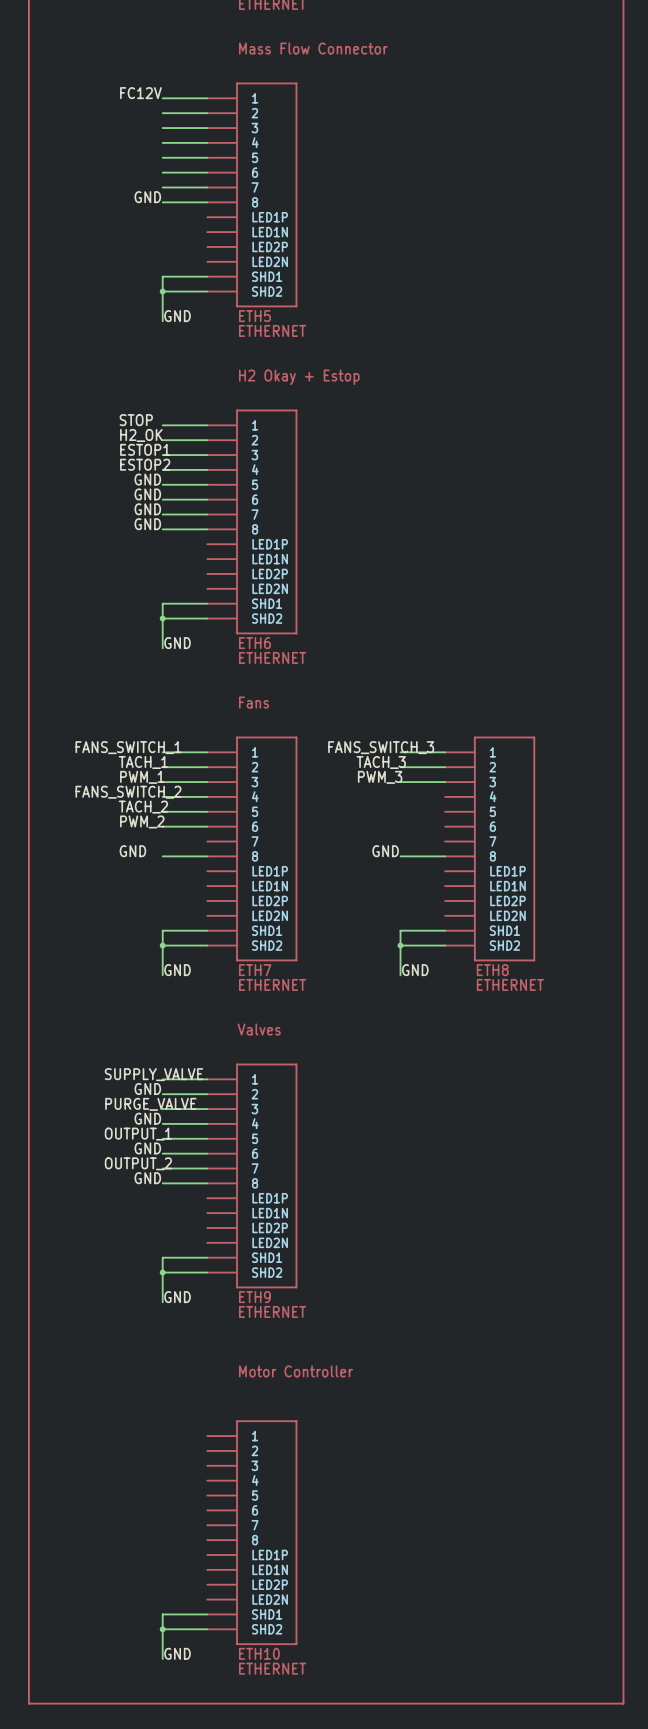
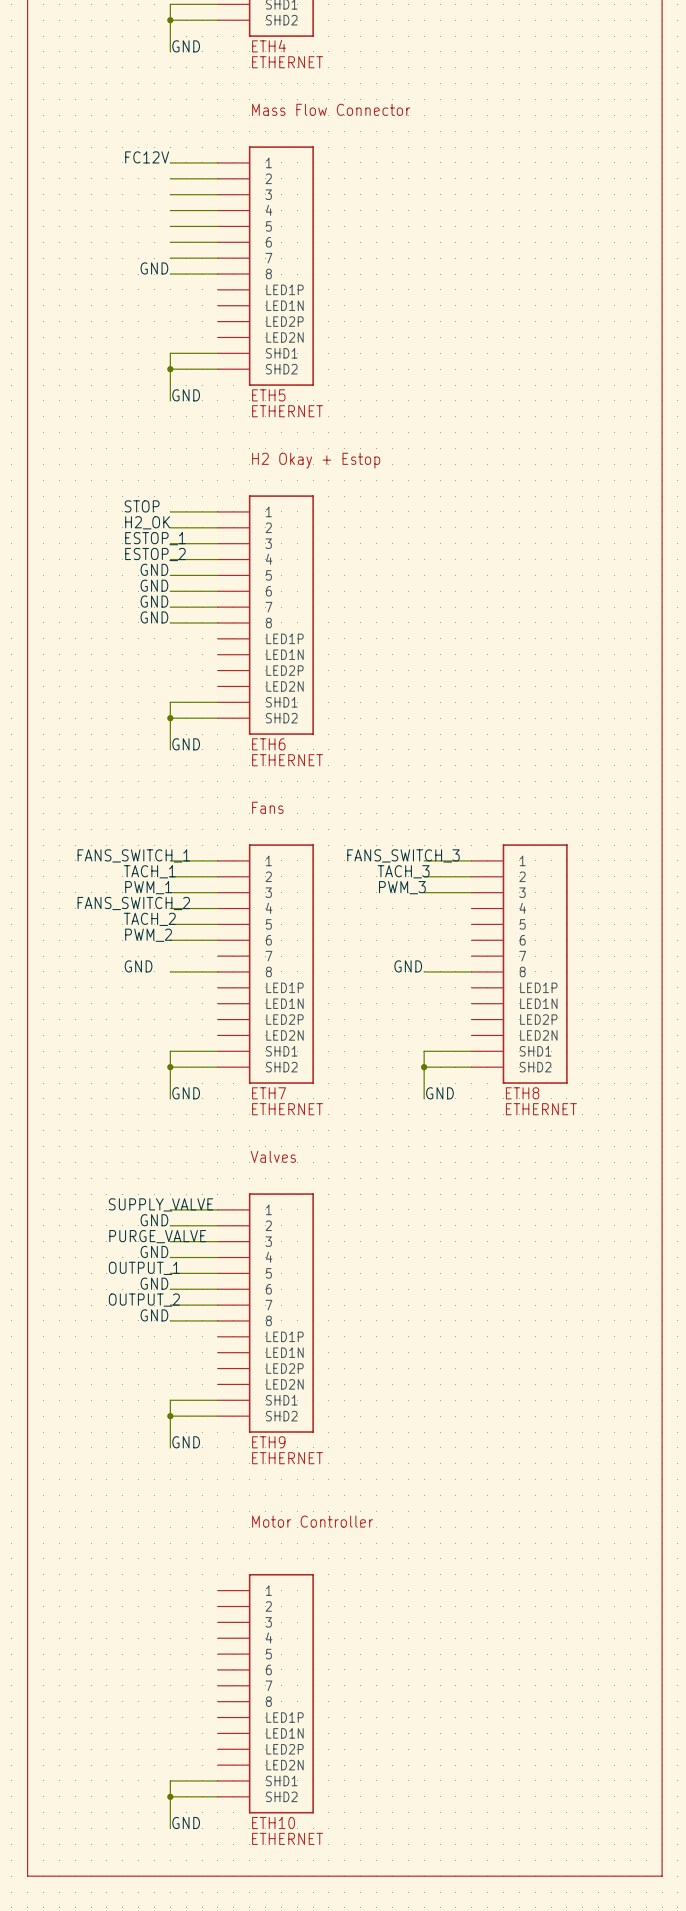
label: ESTOP1 (145, 449) -> ESTOP_1 (155, 538)
label: ESTOP2 (145, 464) -> ESTOP_2 (155, 554)

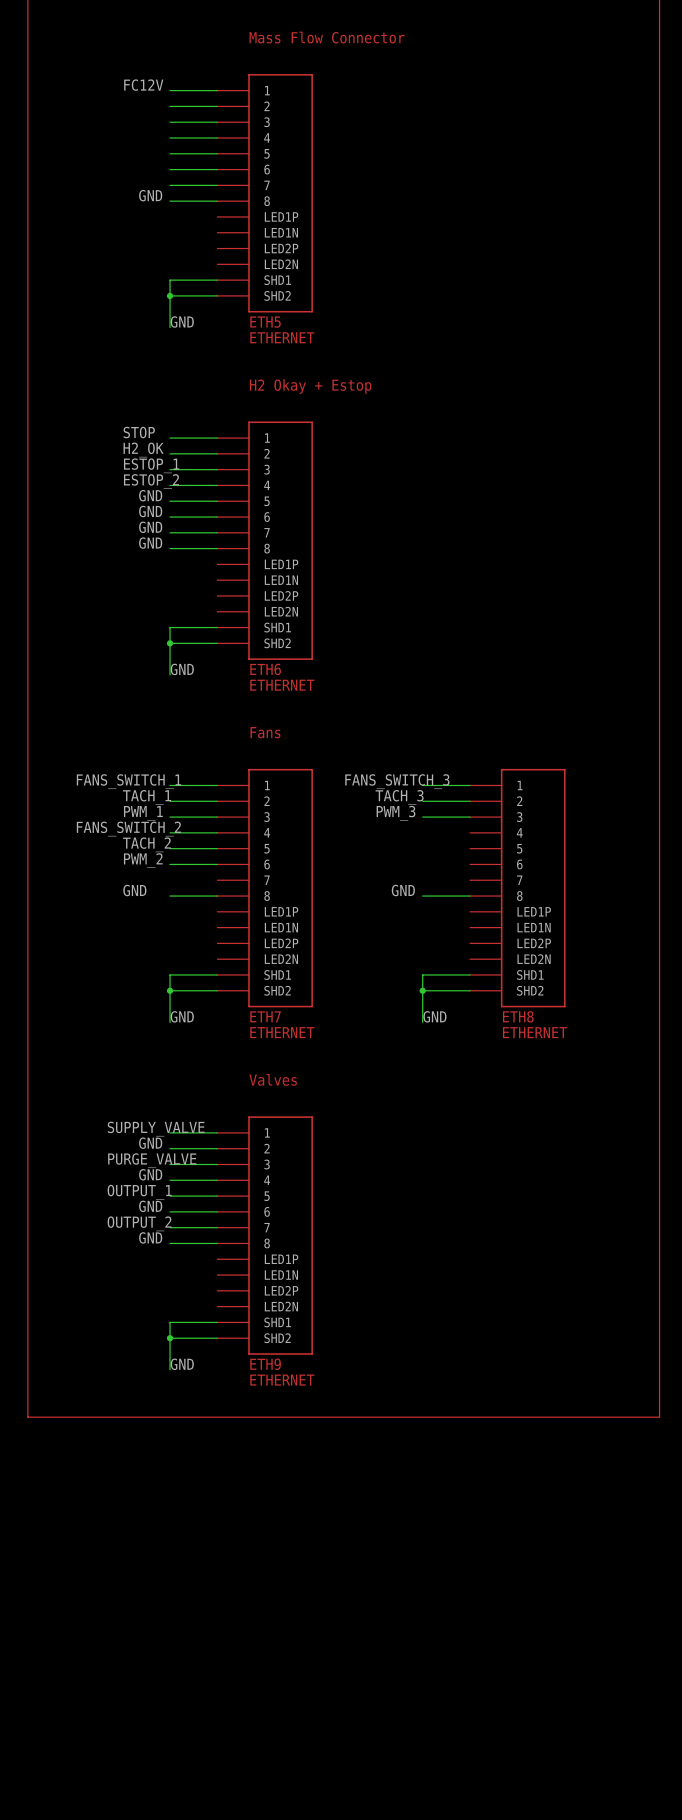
line: (27, 1495) (27, 1876) (662, 1876) (662, 1495) -> (27, 1417) (659, 1417)
text: Motor Controller (312, 1521) -> none
ETH10: ETHERNET (265, 1693) -> none
wire: (217, 1780) (170, 1780) (170, 1828) -> none
wire: (170, 1796) (217, 1796) -> none
junction: (170, 1796) -> none
label: GND (186, 1823) -> none

